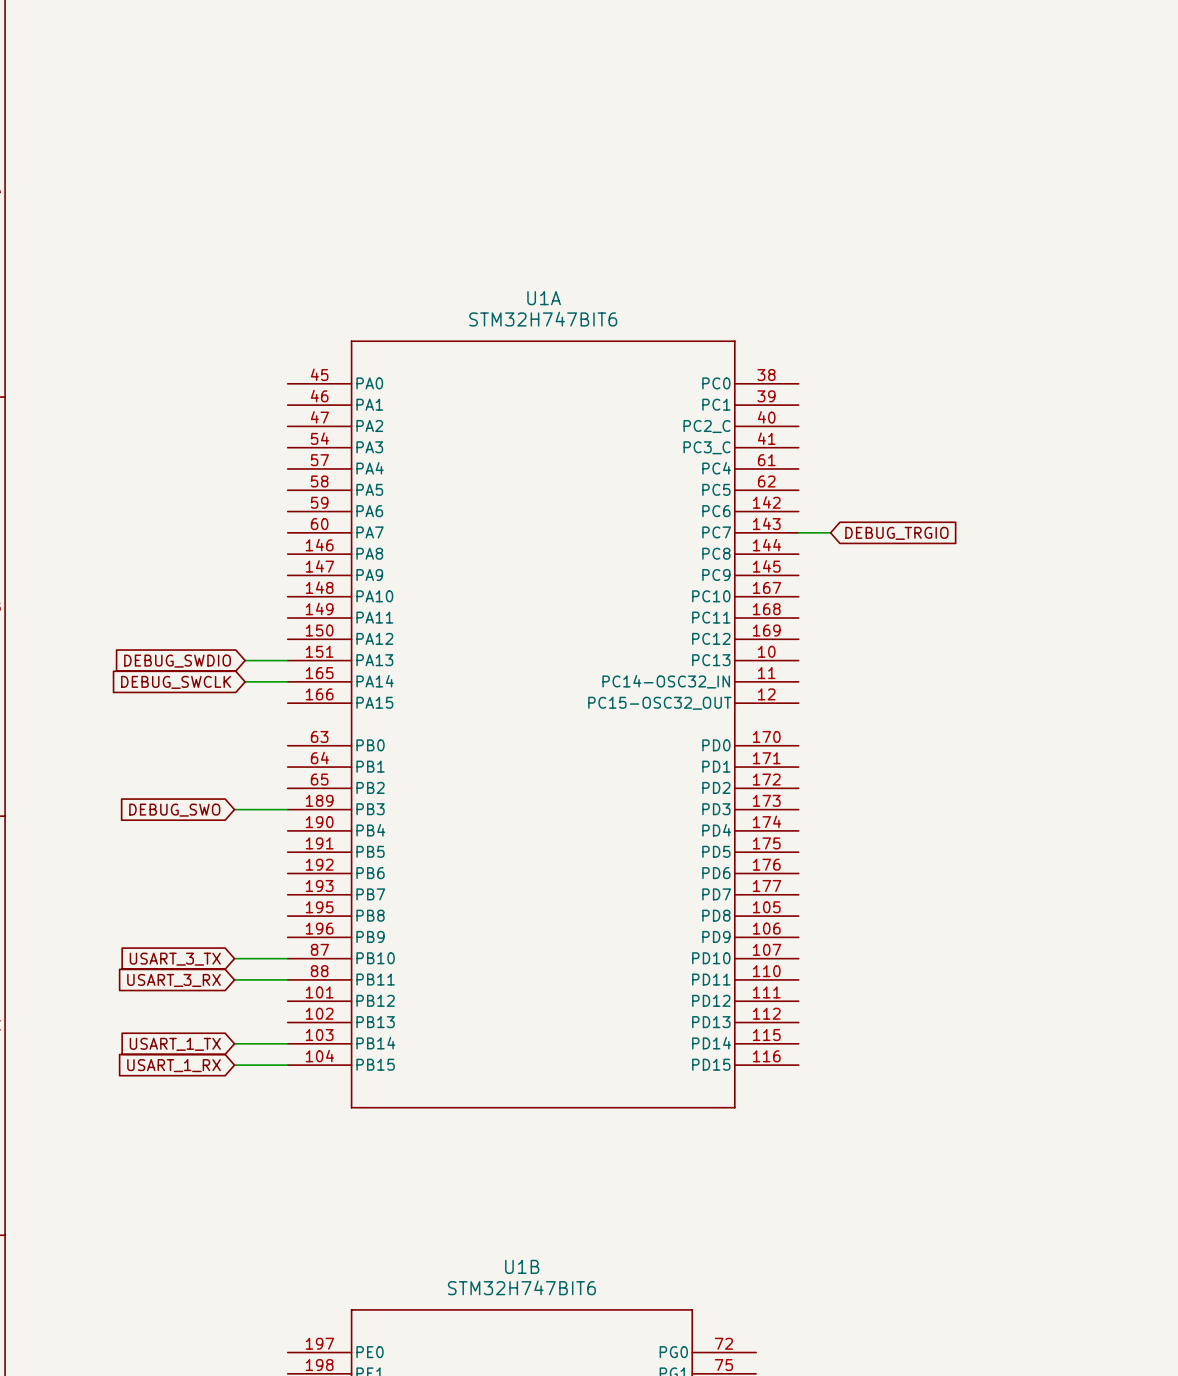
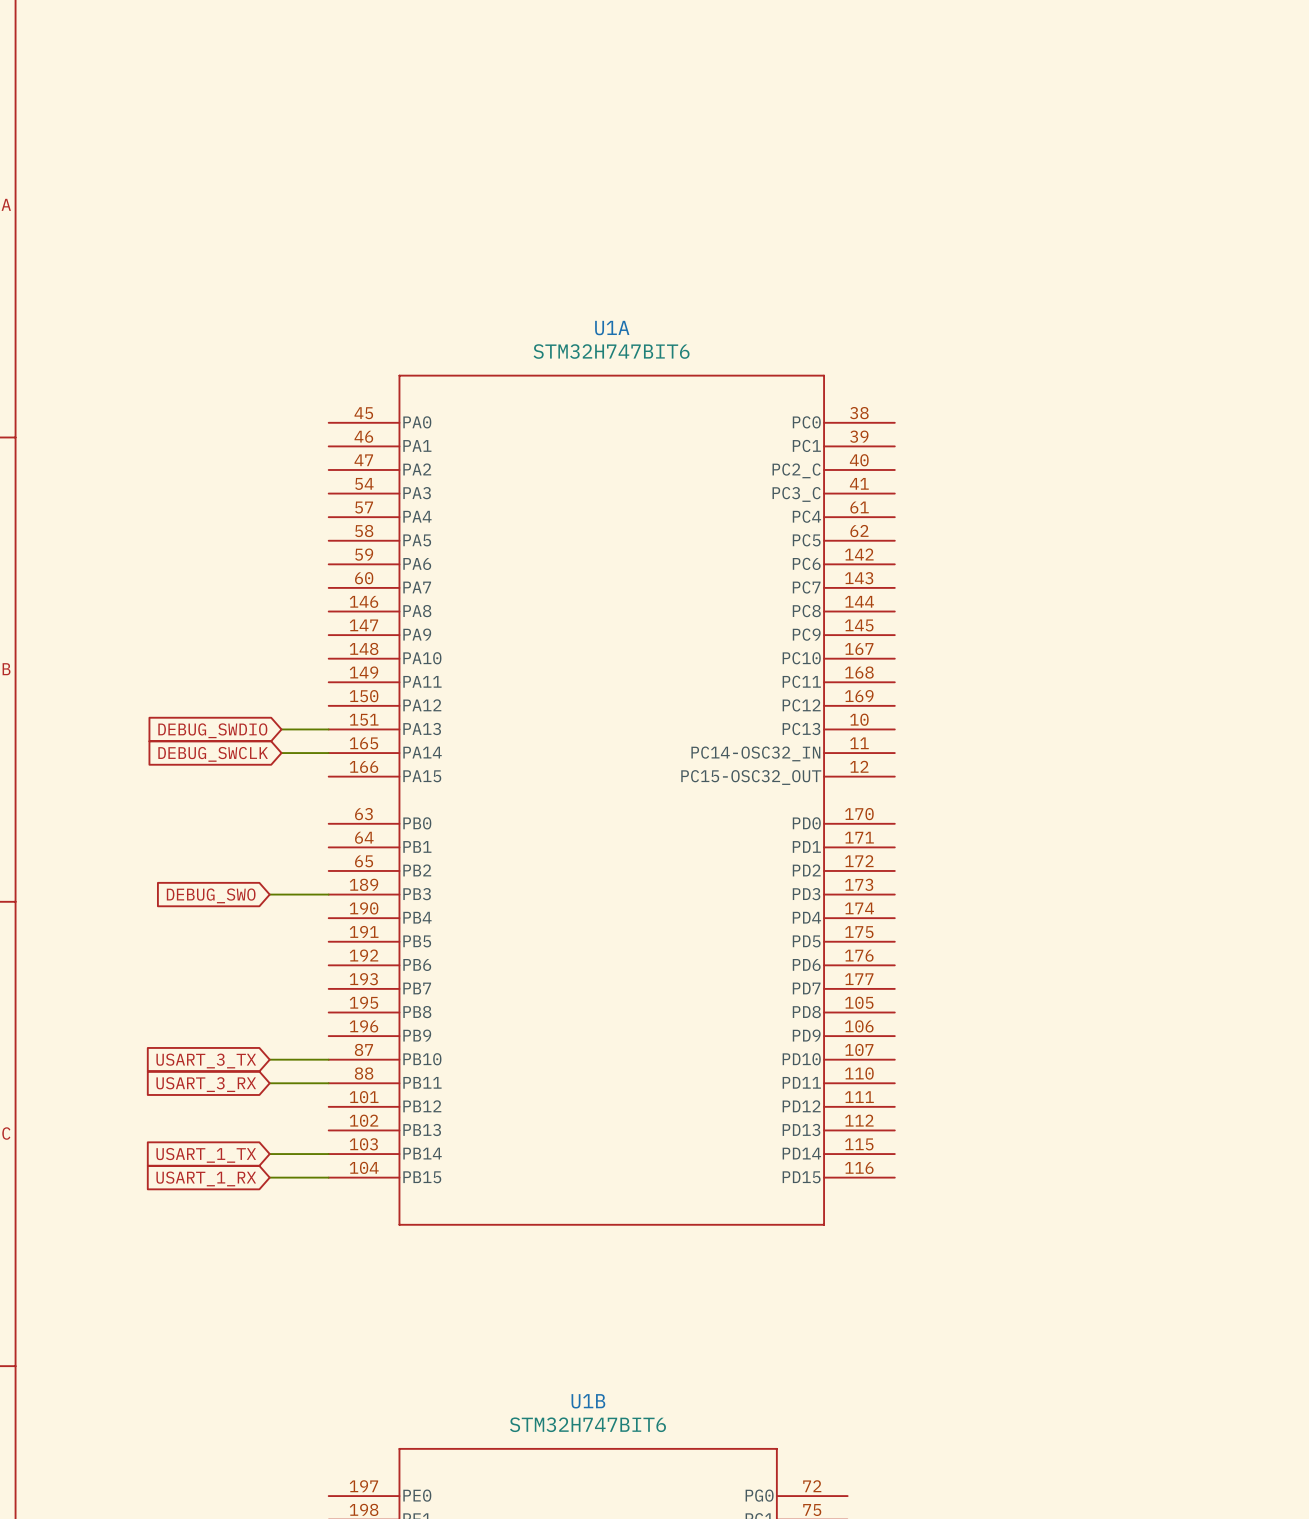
wire: (798, 532) (830, 532) -> none
global label: DEBUG_TRGIO (896, 533) -> none

